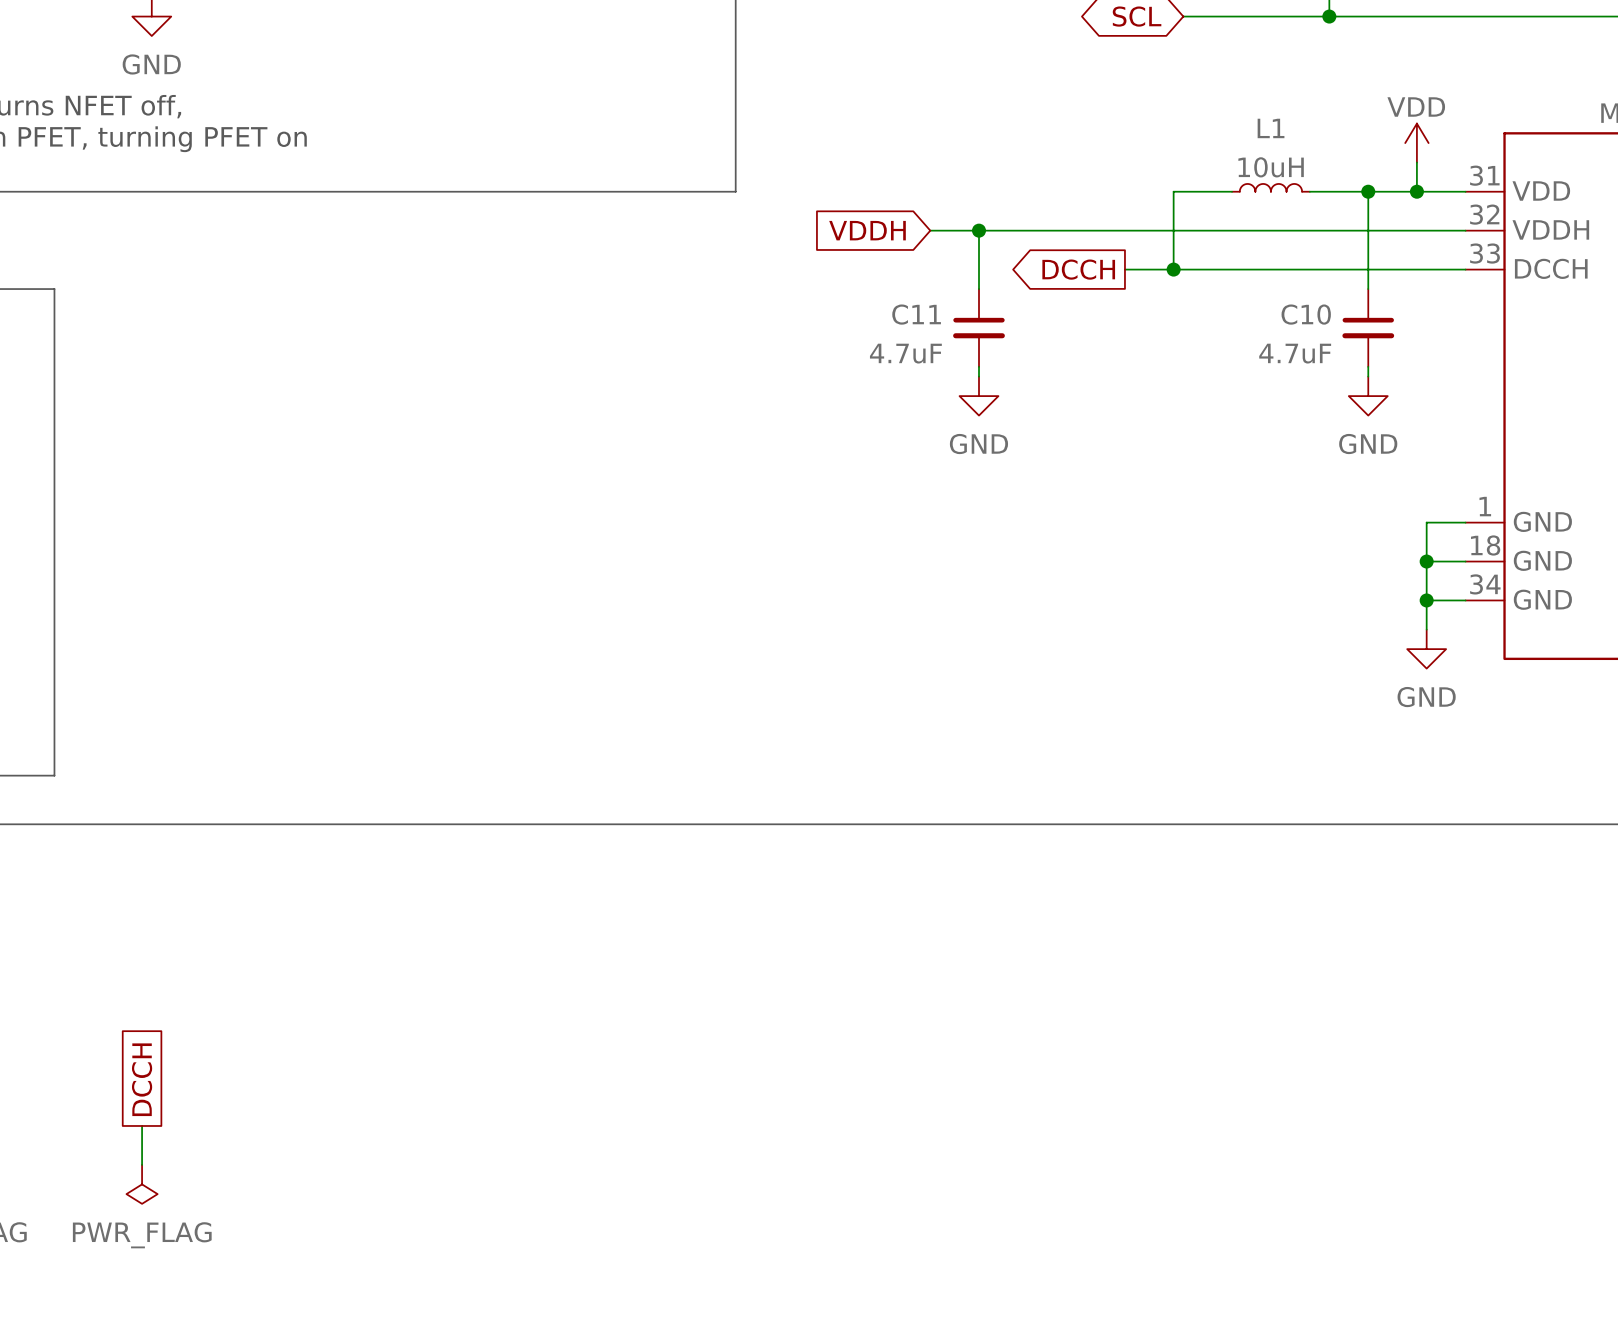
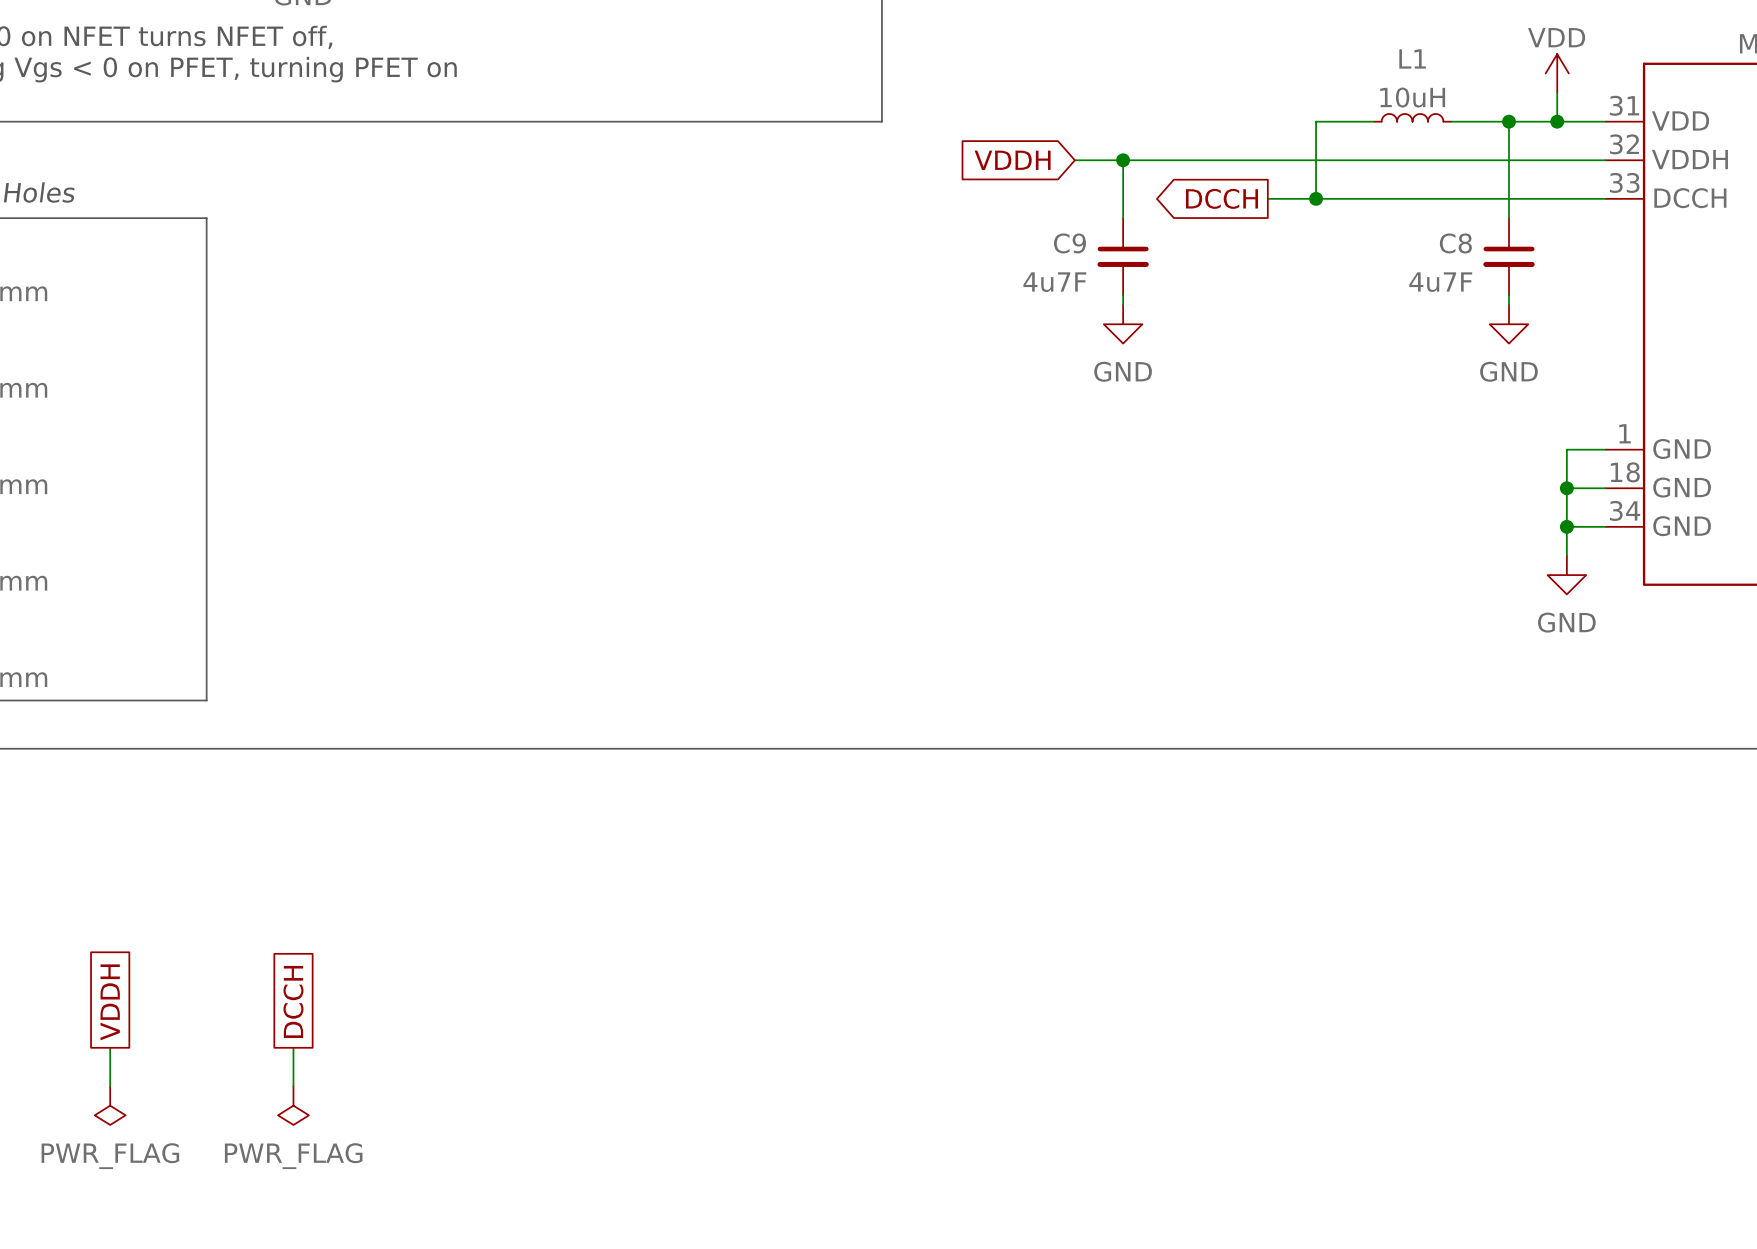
C11 name: C11 (916, 314) -> C9 (1069, 243)
C10 name: C10 (1306, 314) -> C8 (1455, 243)
C11 value: 4.7uF (905, 353) -> 4u7F (1054, 282)
C10 value: 4.7uF (1295, 353) -> 4u7F (1440, 282)

